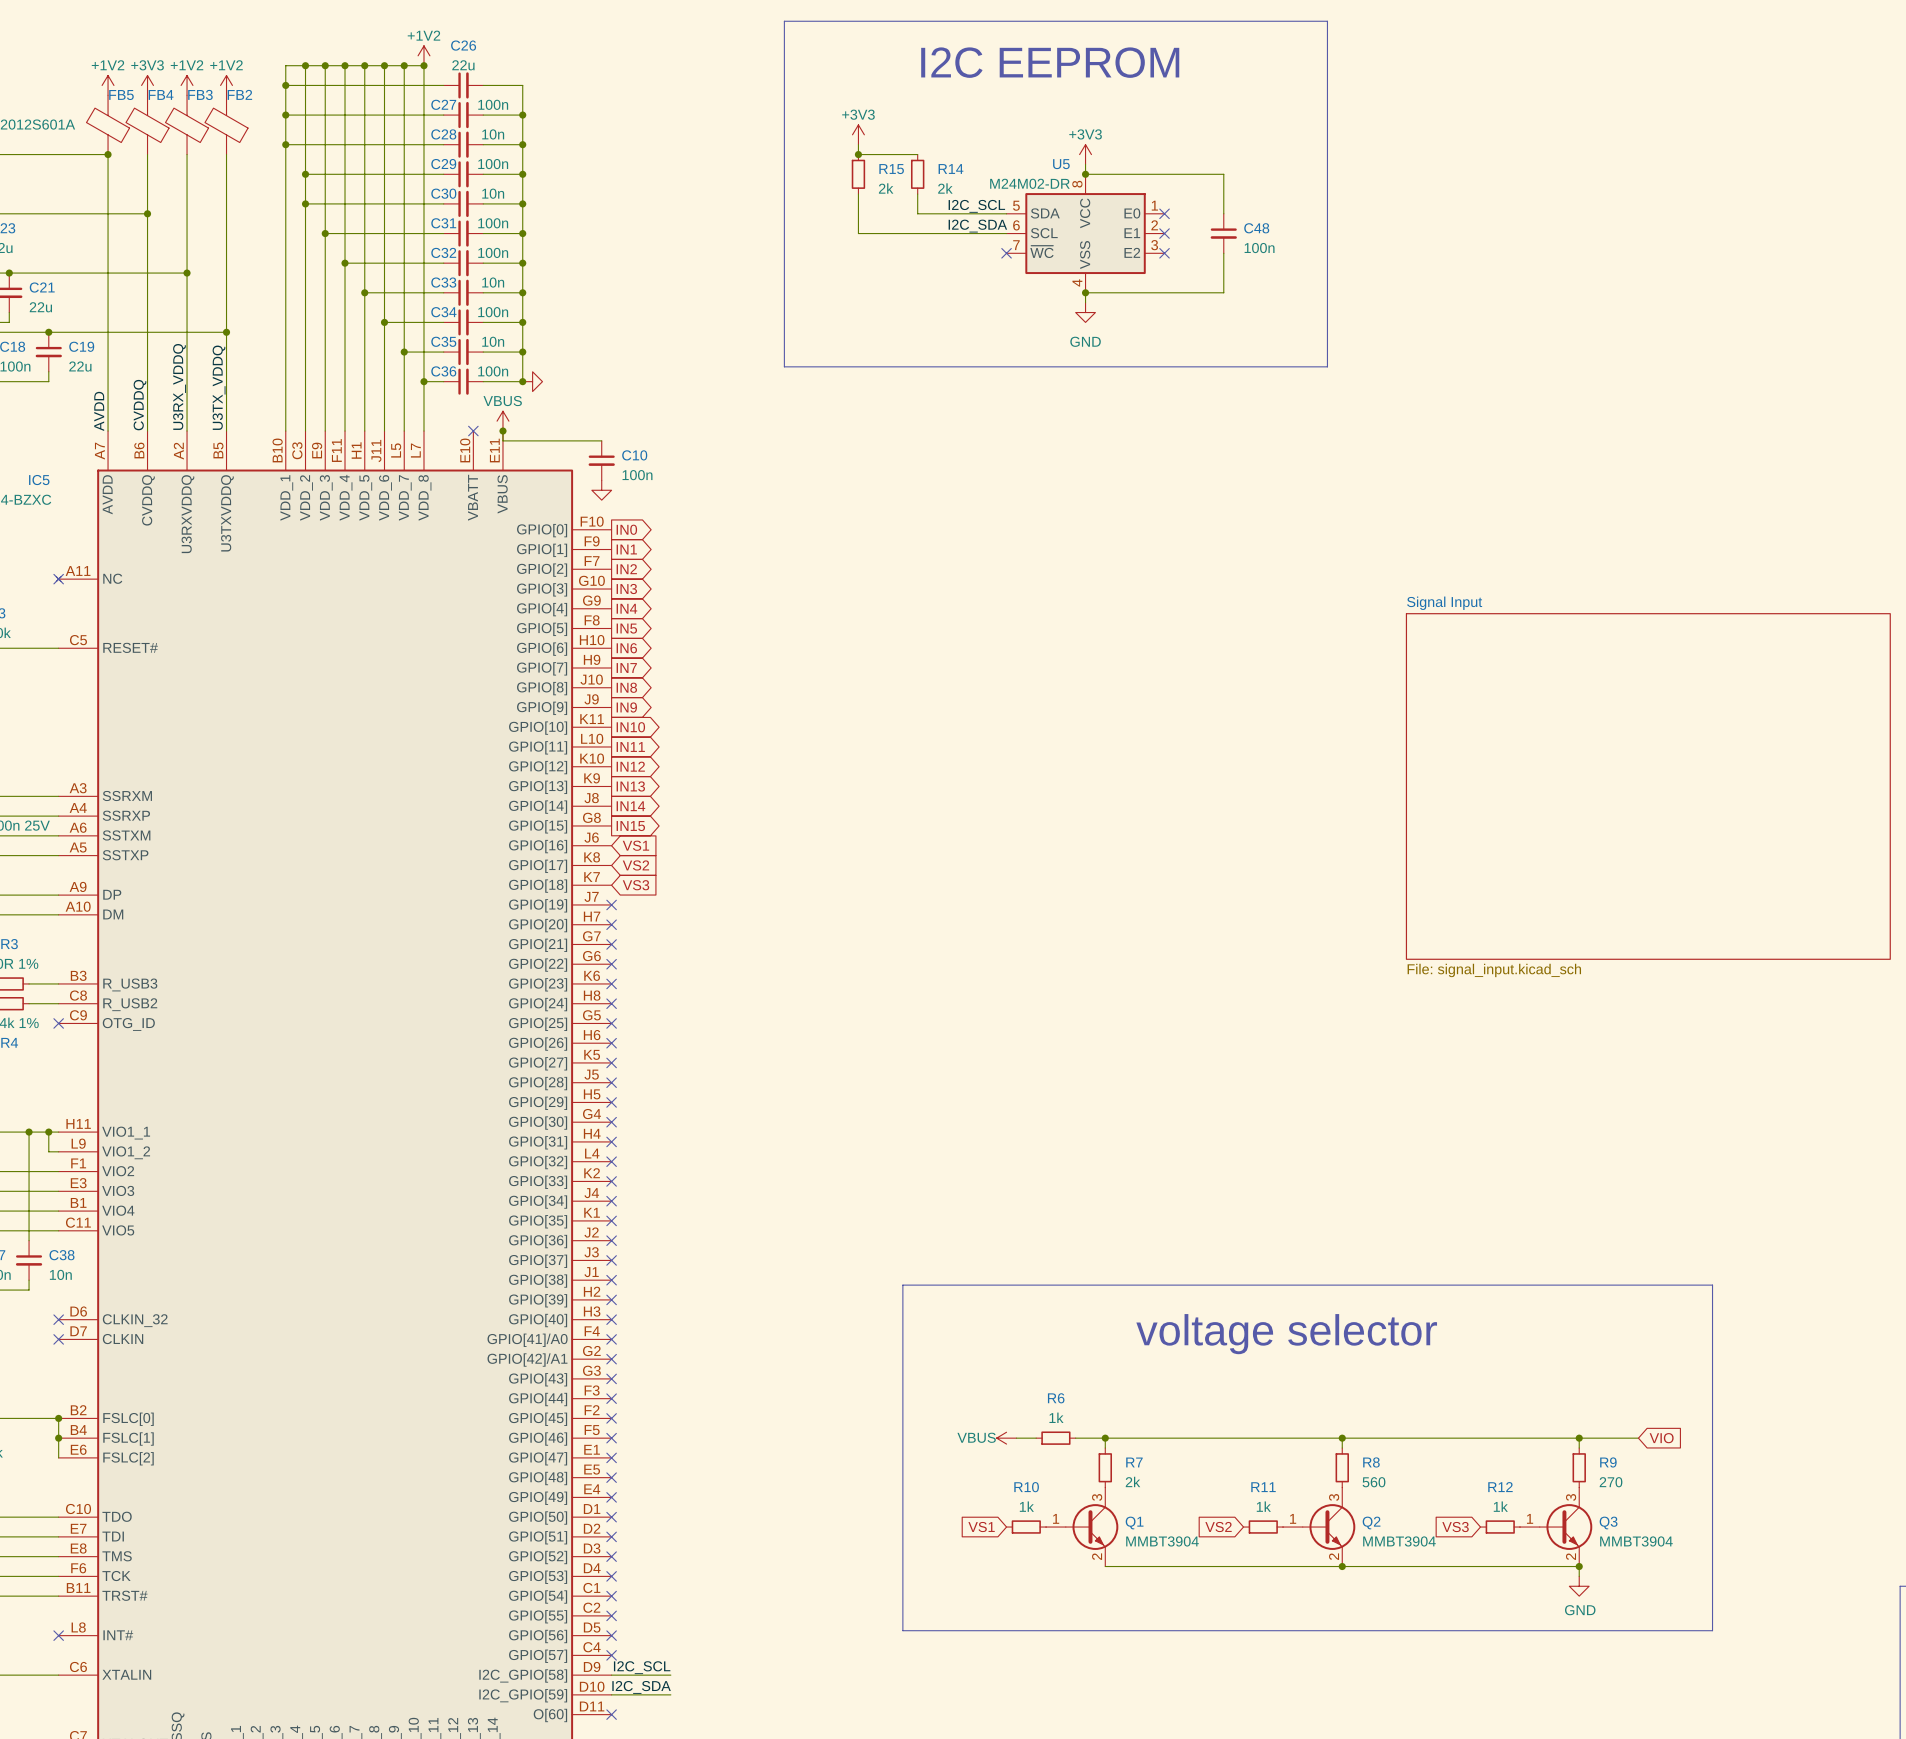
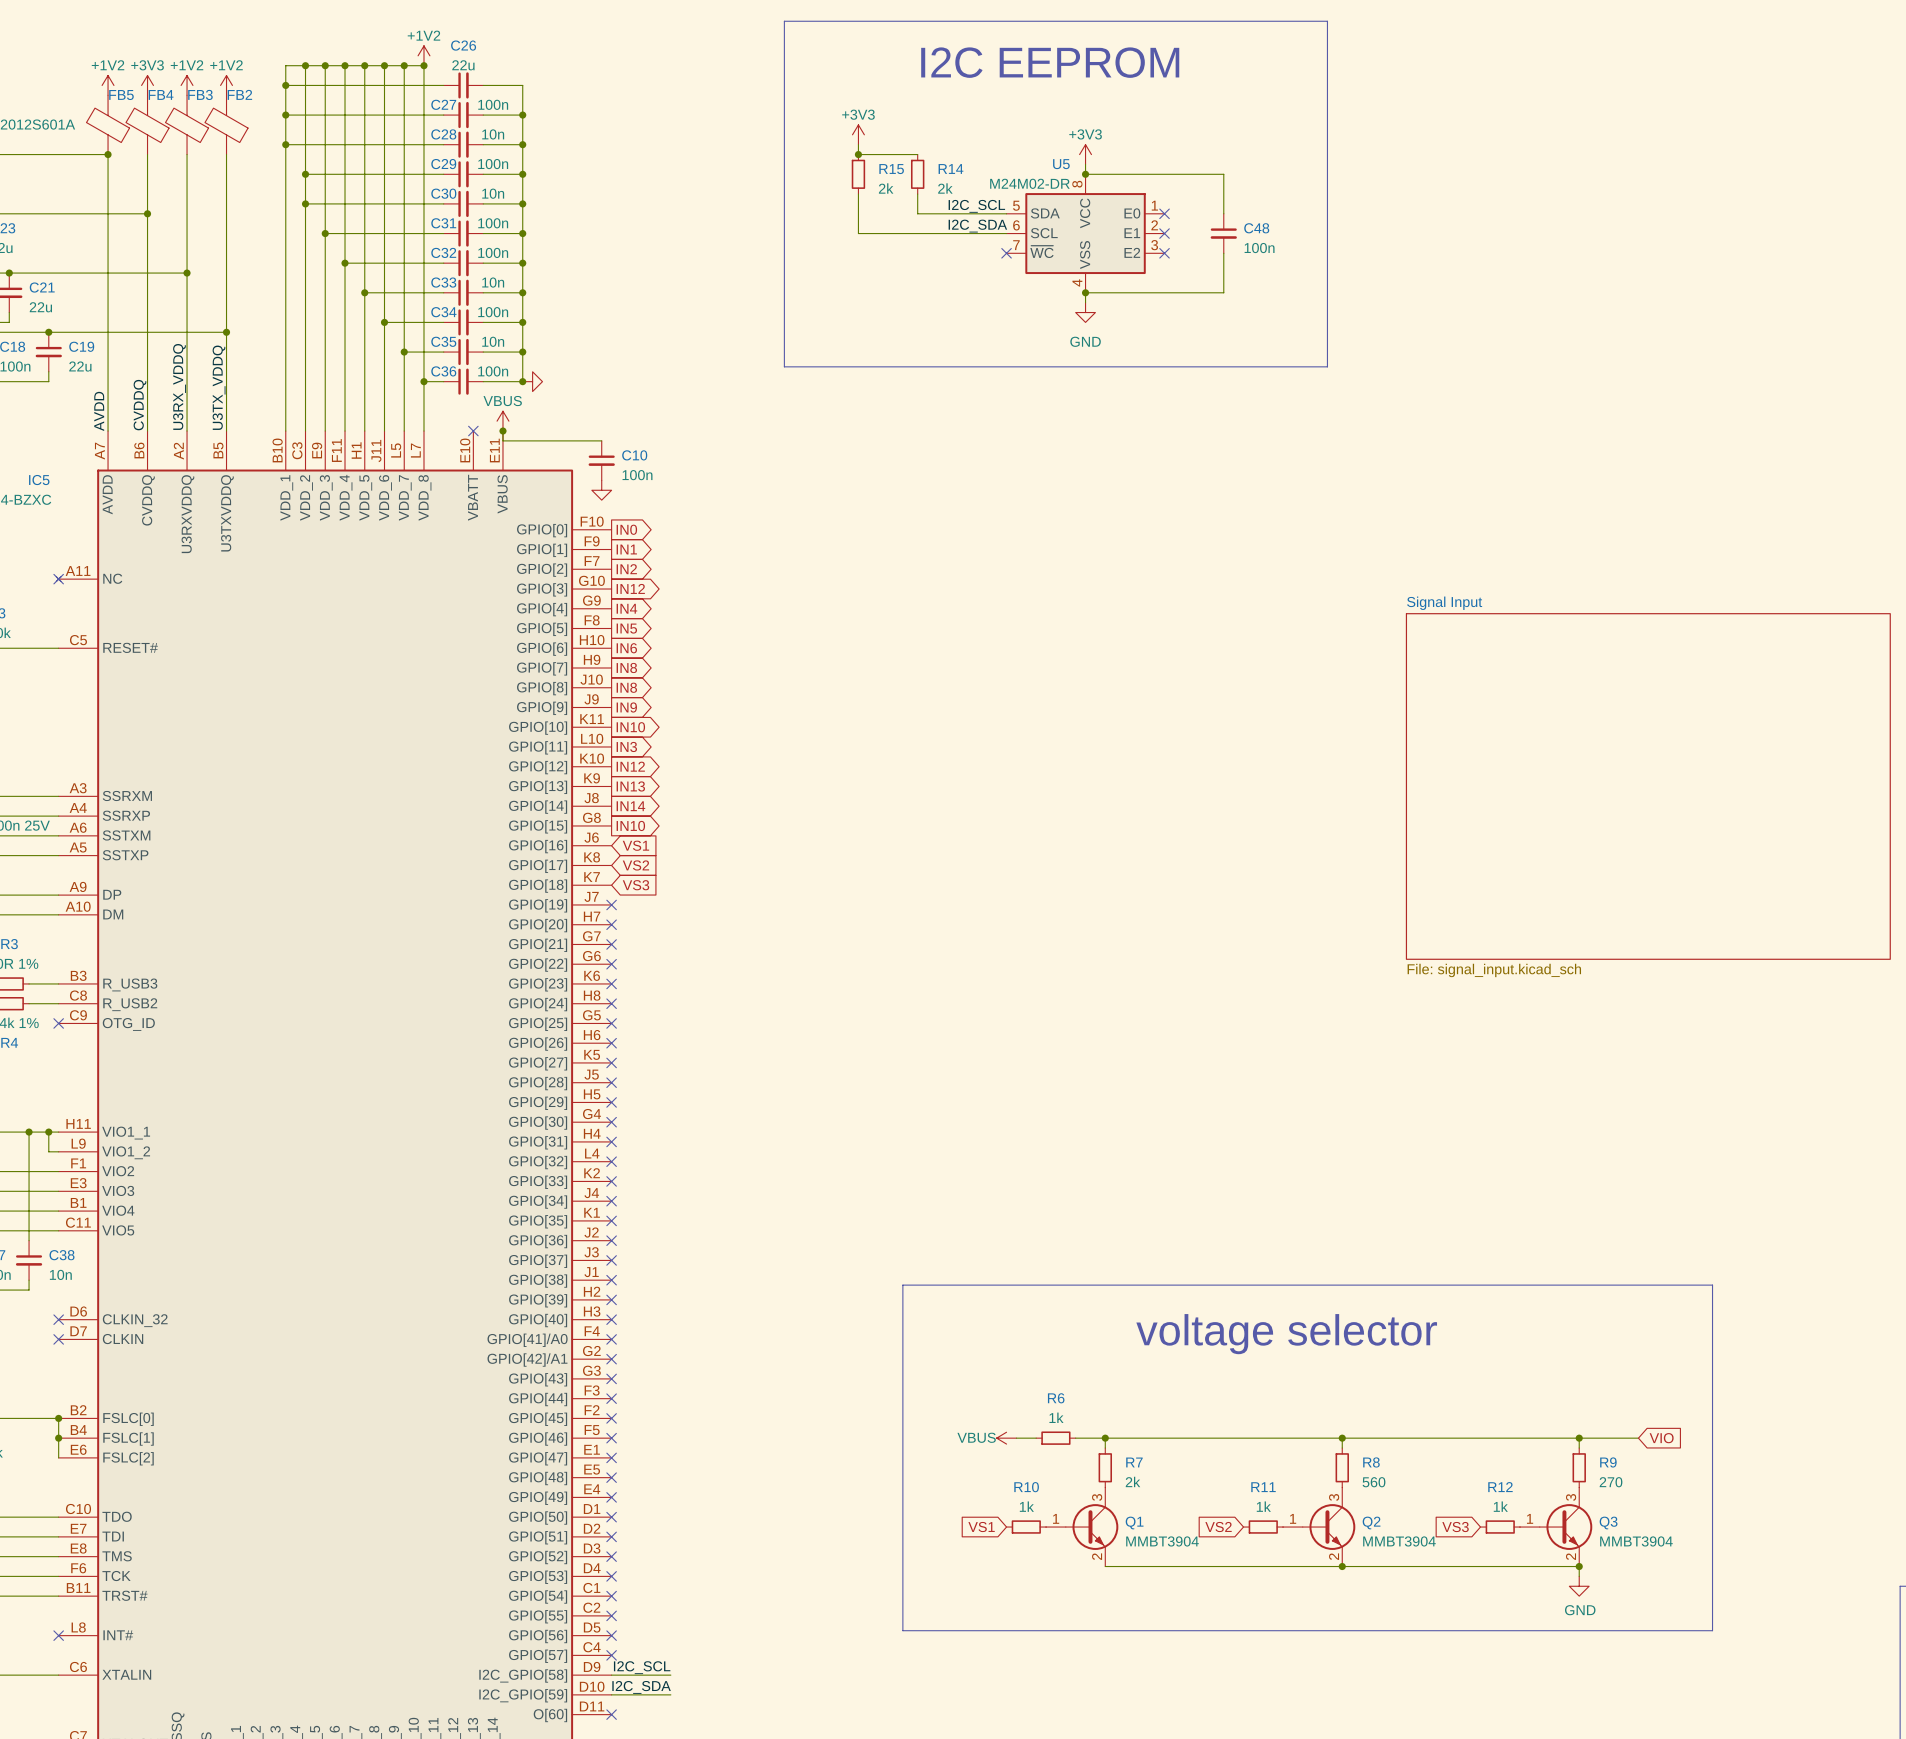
global label: IN3 (626, 589) -> IN12 (630, 588)
global label: IN7 (626, 668) -> IN8 (626, 667)
global label: IN11 (630, 746) -> IN3 (626, 746)
global label: IN15 (630, 826) -> IN10 (630, 825)

